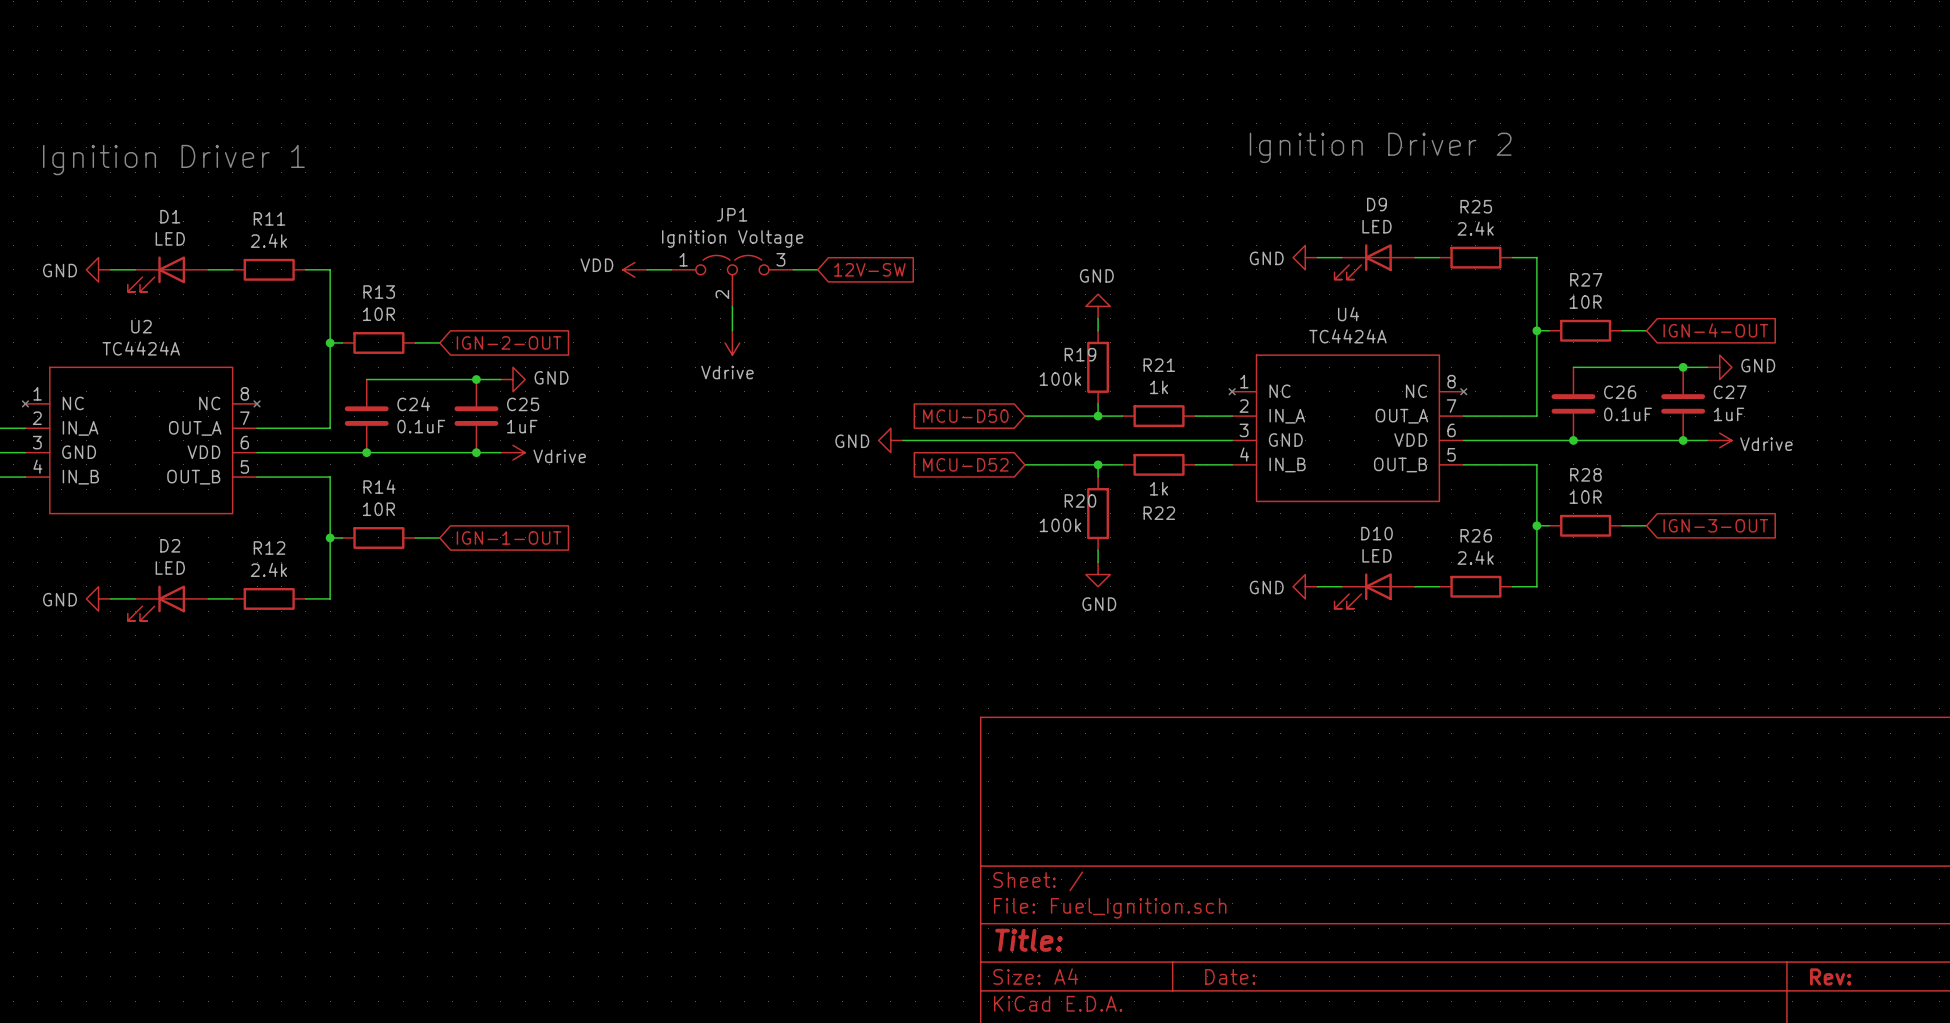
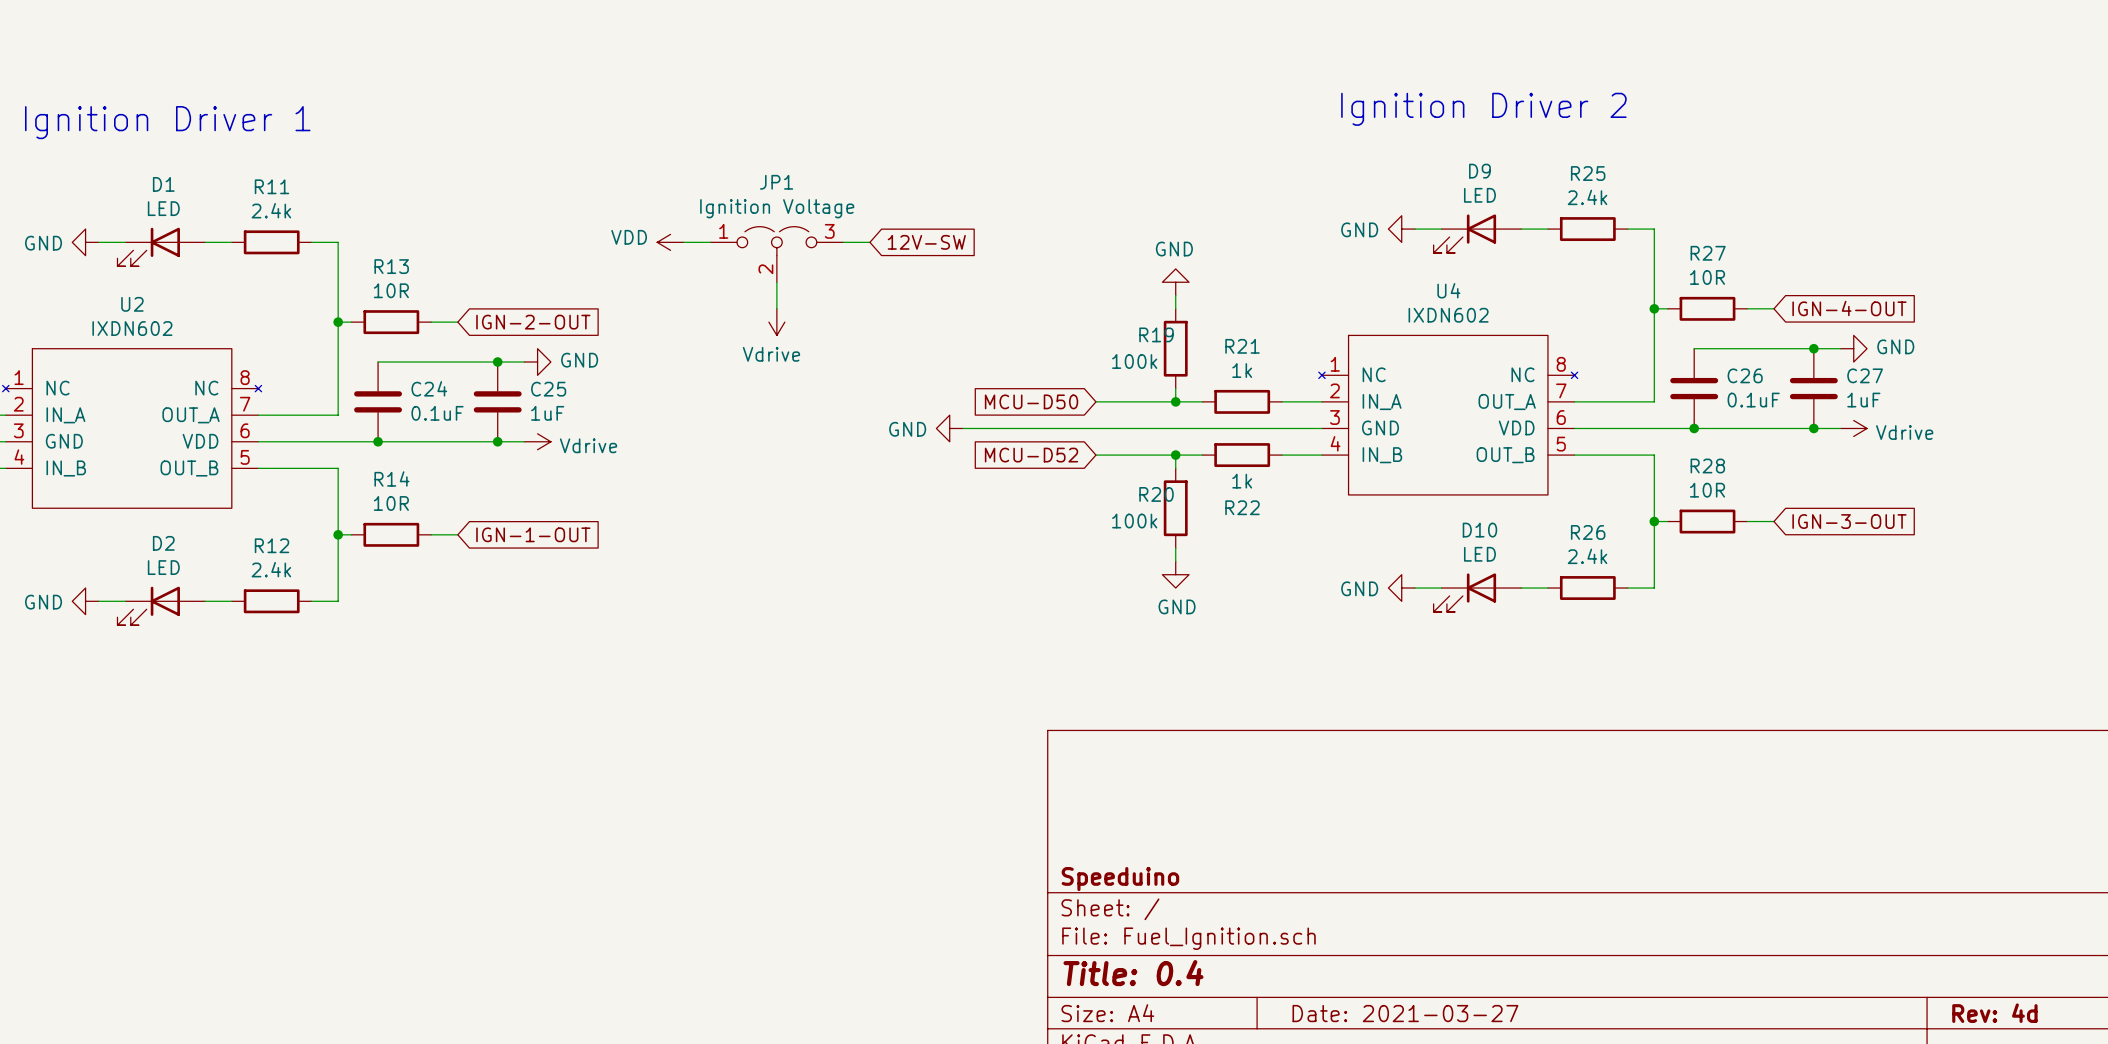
U4 value: TC4424A (1347, 336) -> IXDN602 (1448, 315)
U2 value: TC4424A (141, 348) -> IXDN602 (132, 328)
title block: none -> Speeduino (1120, 879)
title block: Title: (1029, 940) -> Title: 0.4 (1133, 973)
title block: Date: (1230, 976) -> Date: 2021-03-27 (1405, 1013)
title block: Rev: (1830, 976) -> Rev: 4d (1994, 1013)

